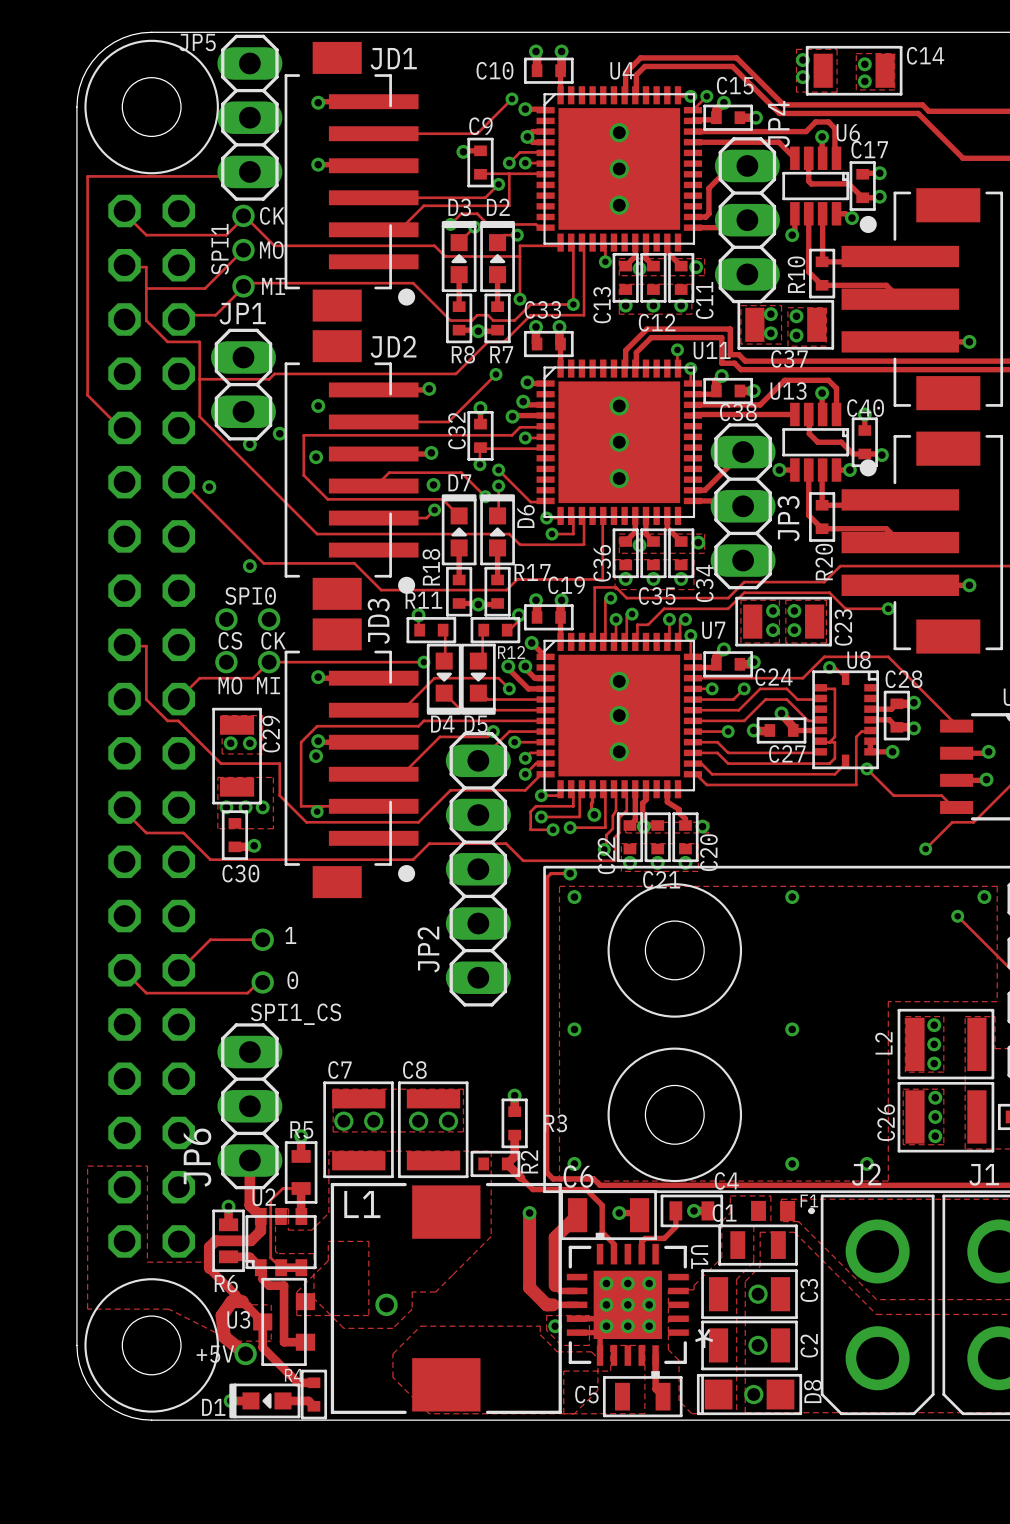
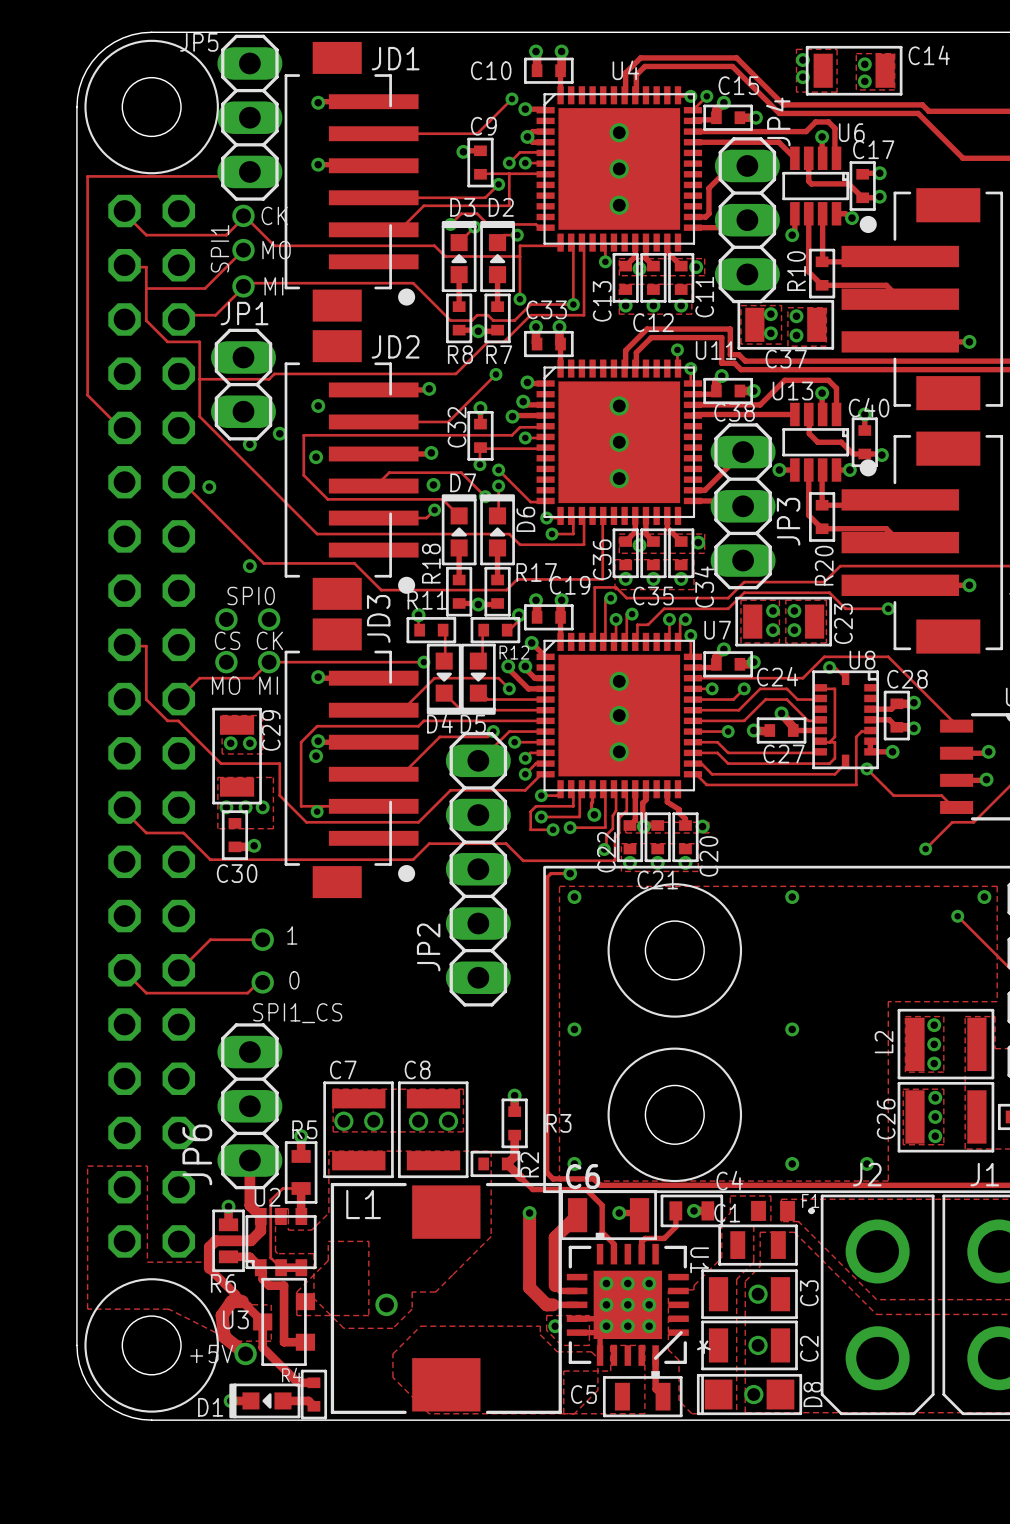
line: none -> (681, 1332) (655, 1358)

